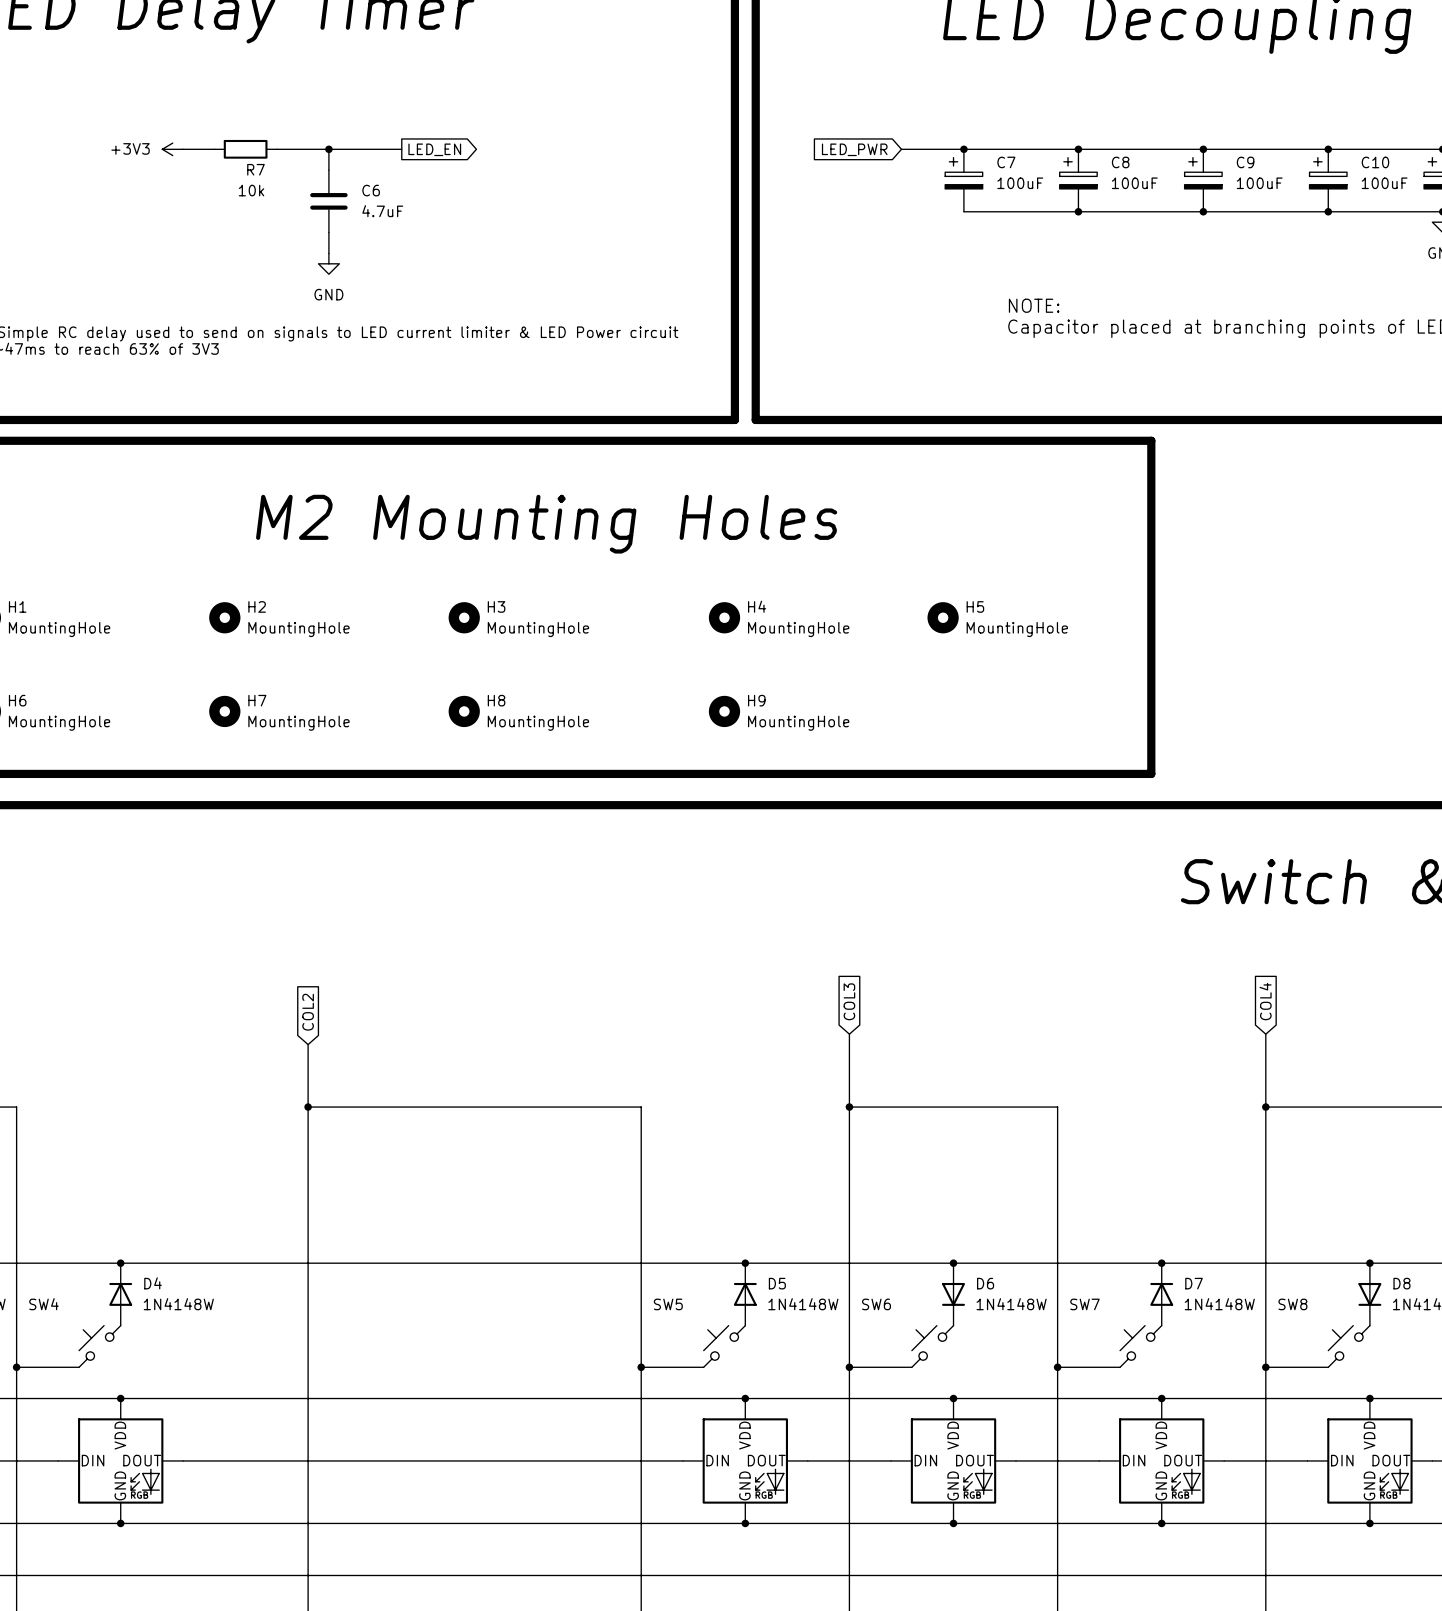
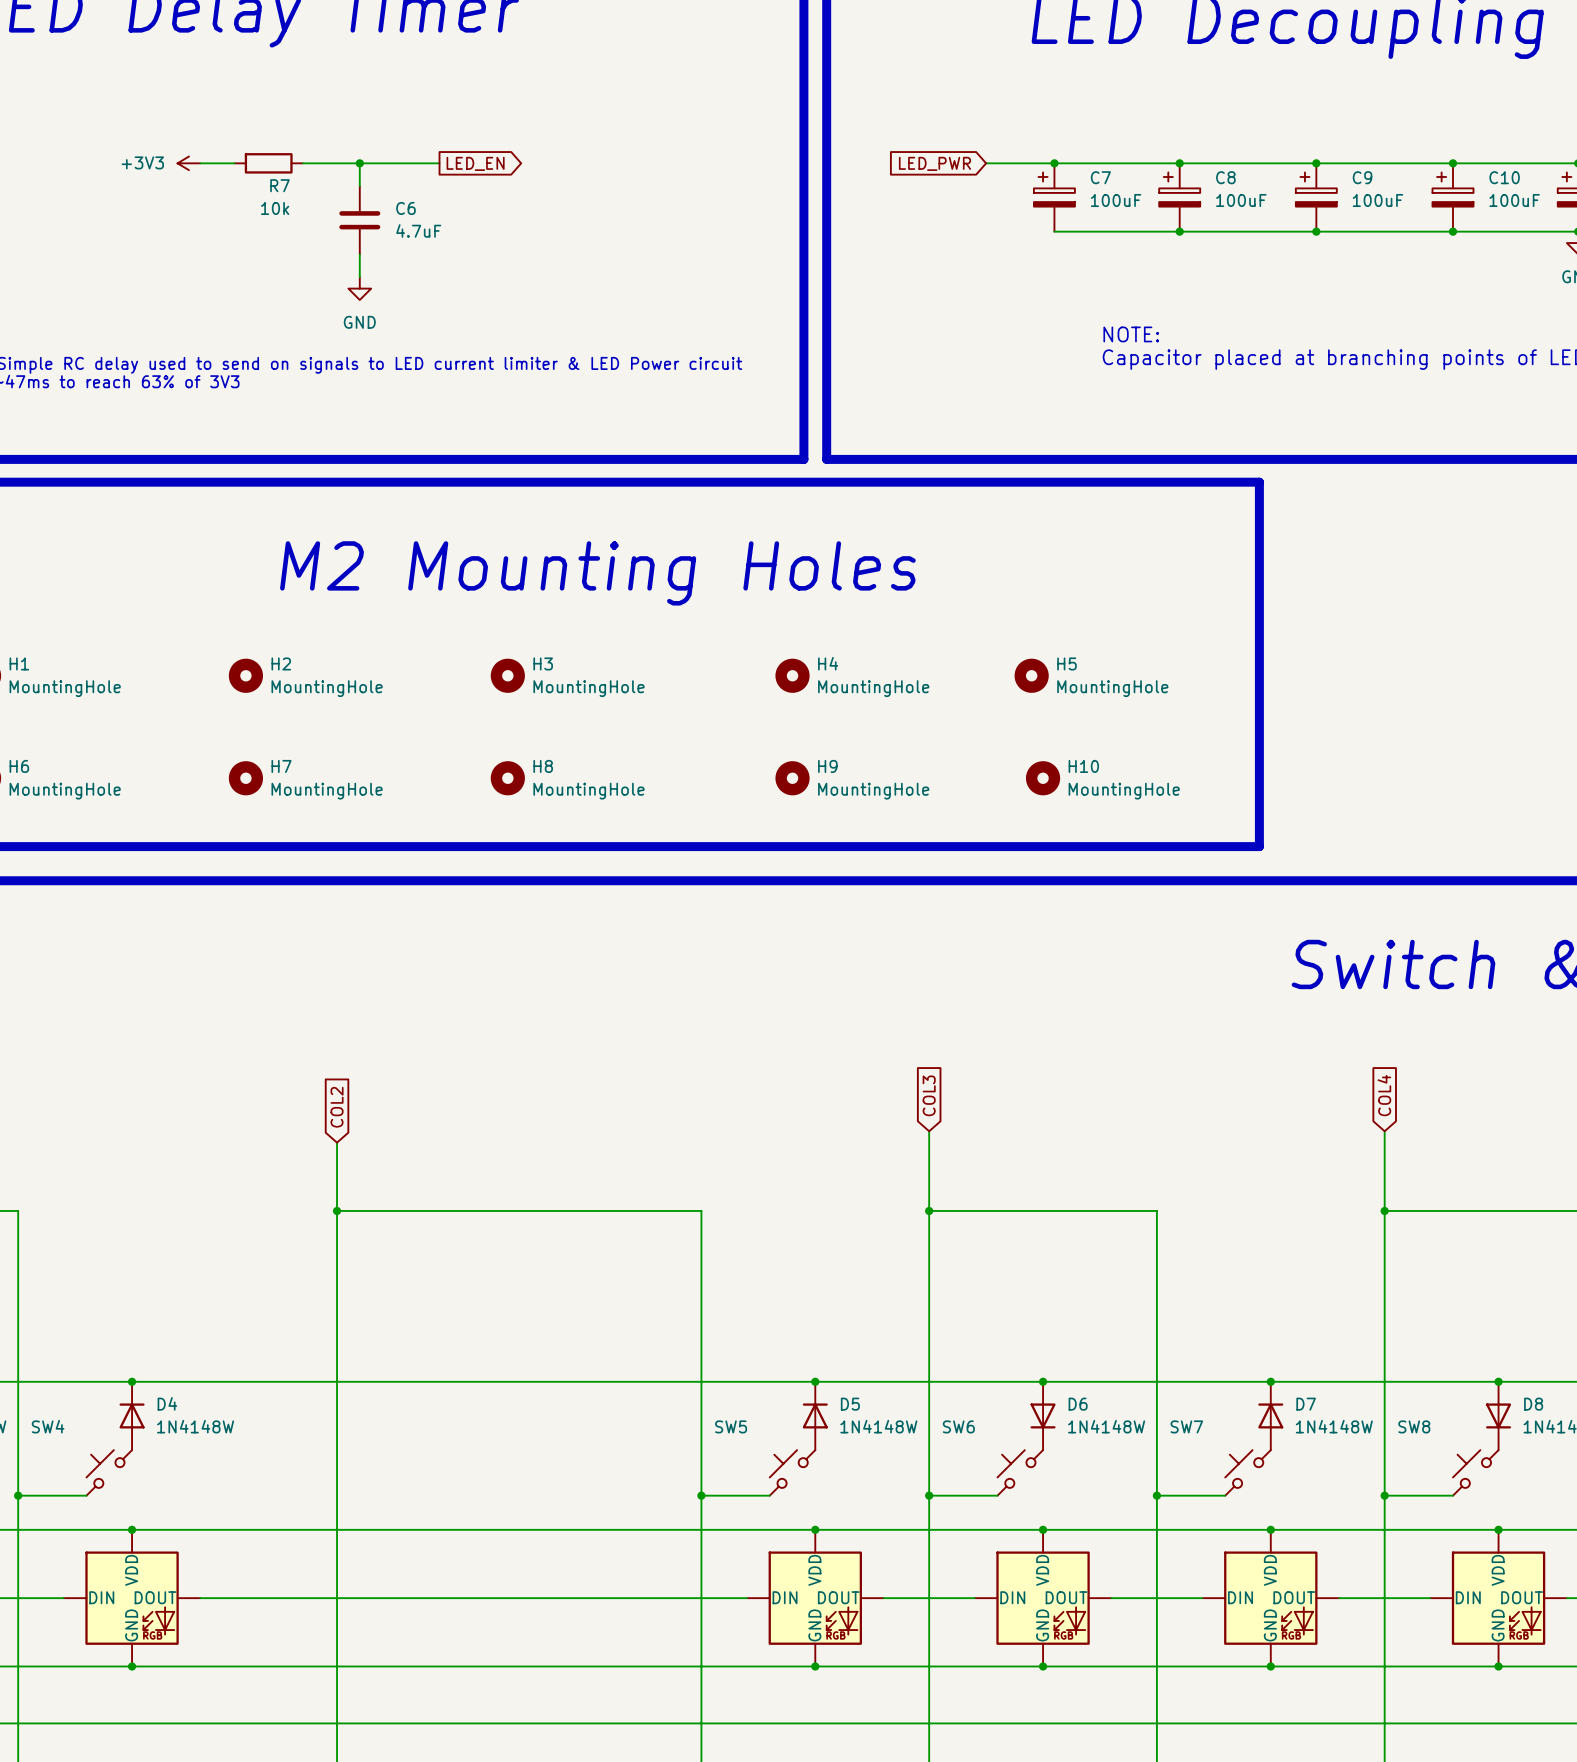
H10: none -> MountingHole (1043, 778)

